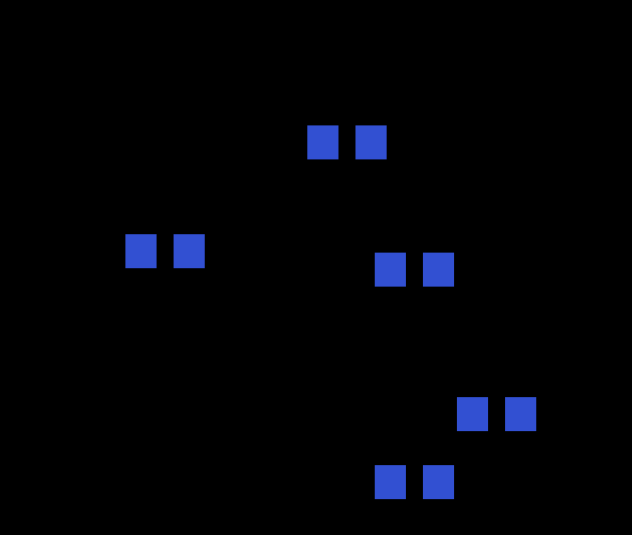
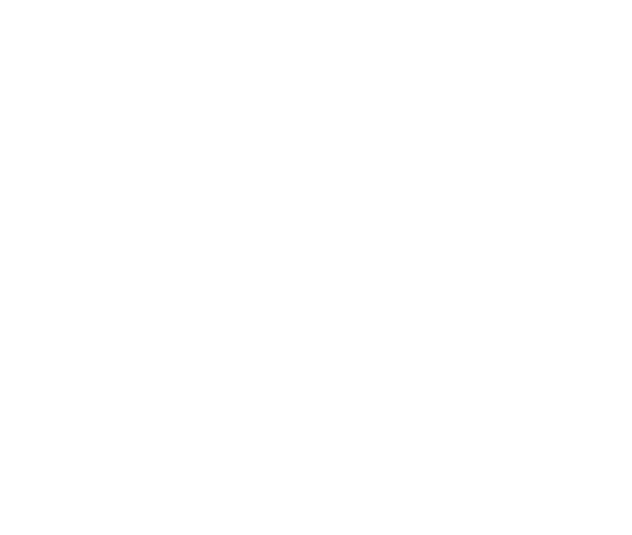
part: (346, 142) -> none
part: (165, 251) -> none
part: (414, 269) -> none
part: (496, 414) -> none
part: (414, 482) -> none

